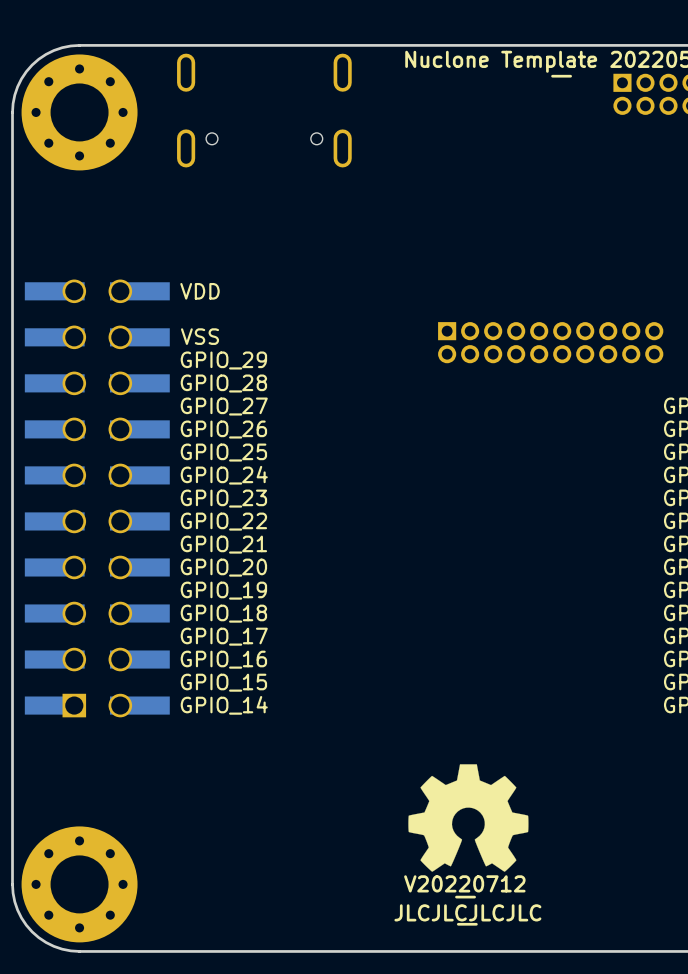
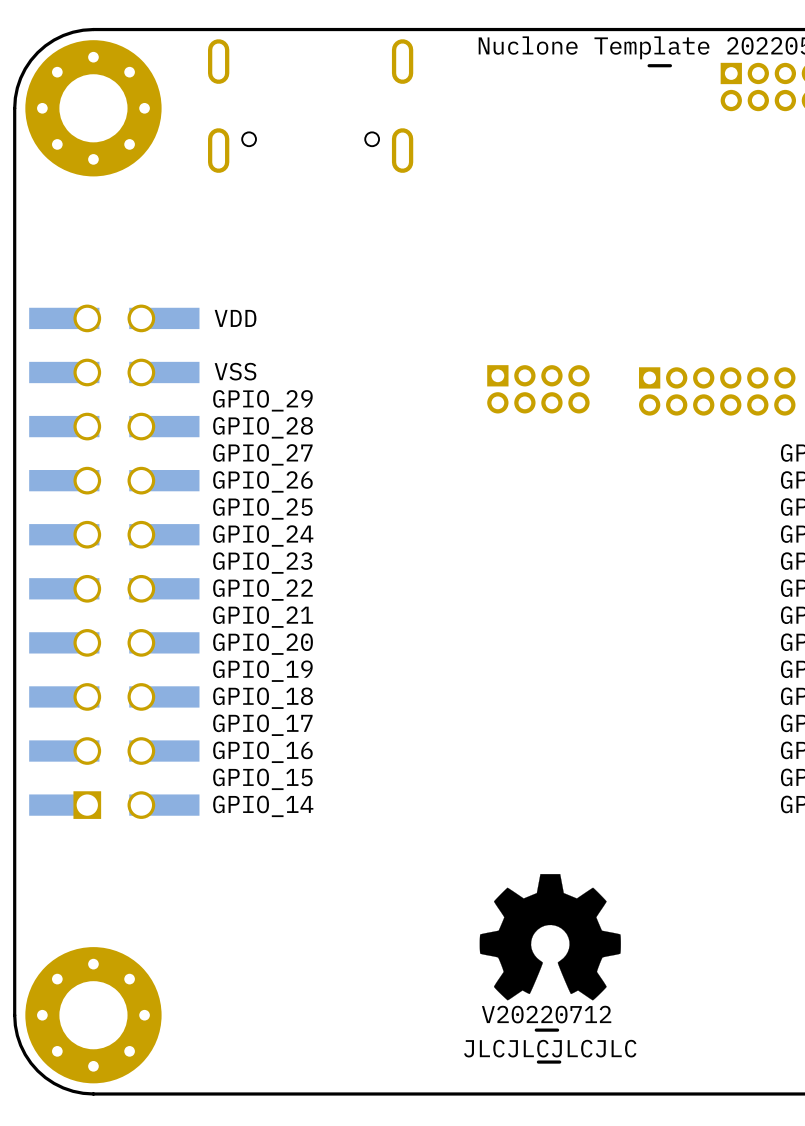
part: (550, 342) -> none
part: none -> (538, 389)
part: none -> (717, 391)

